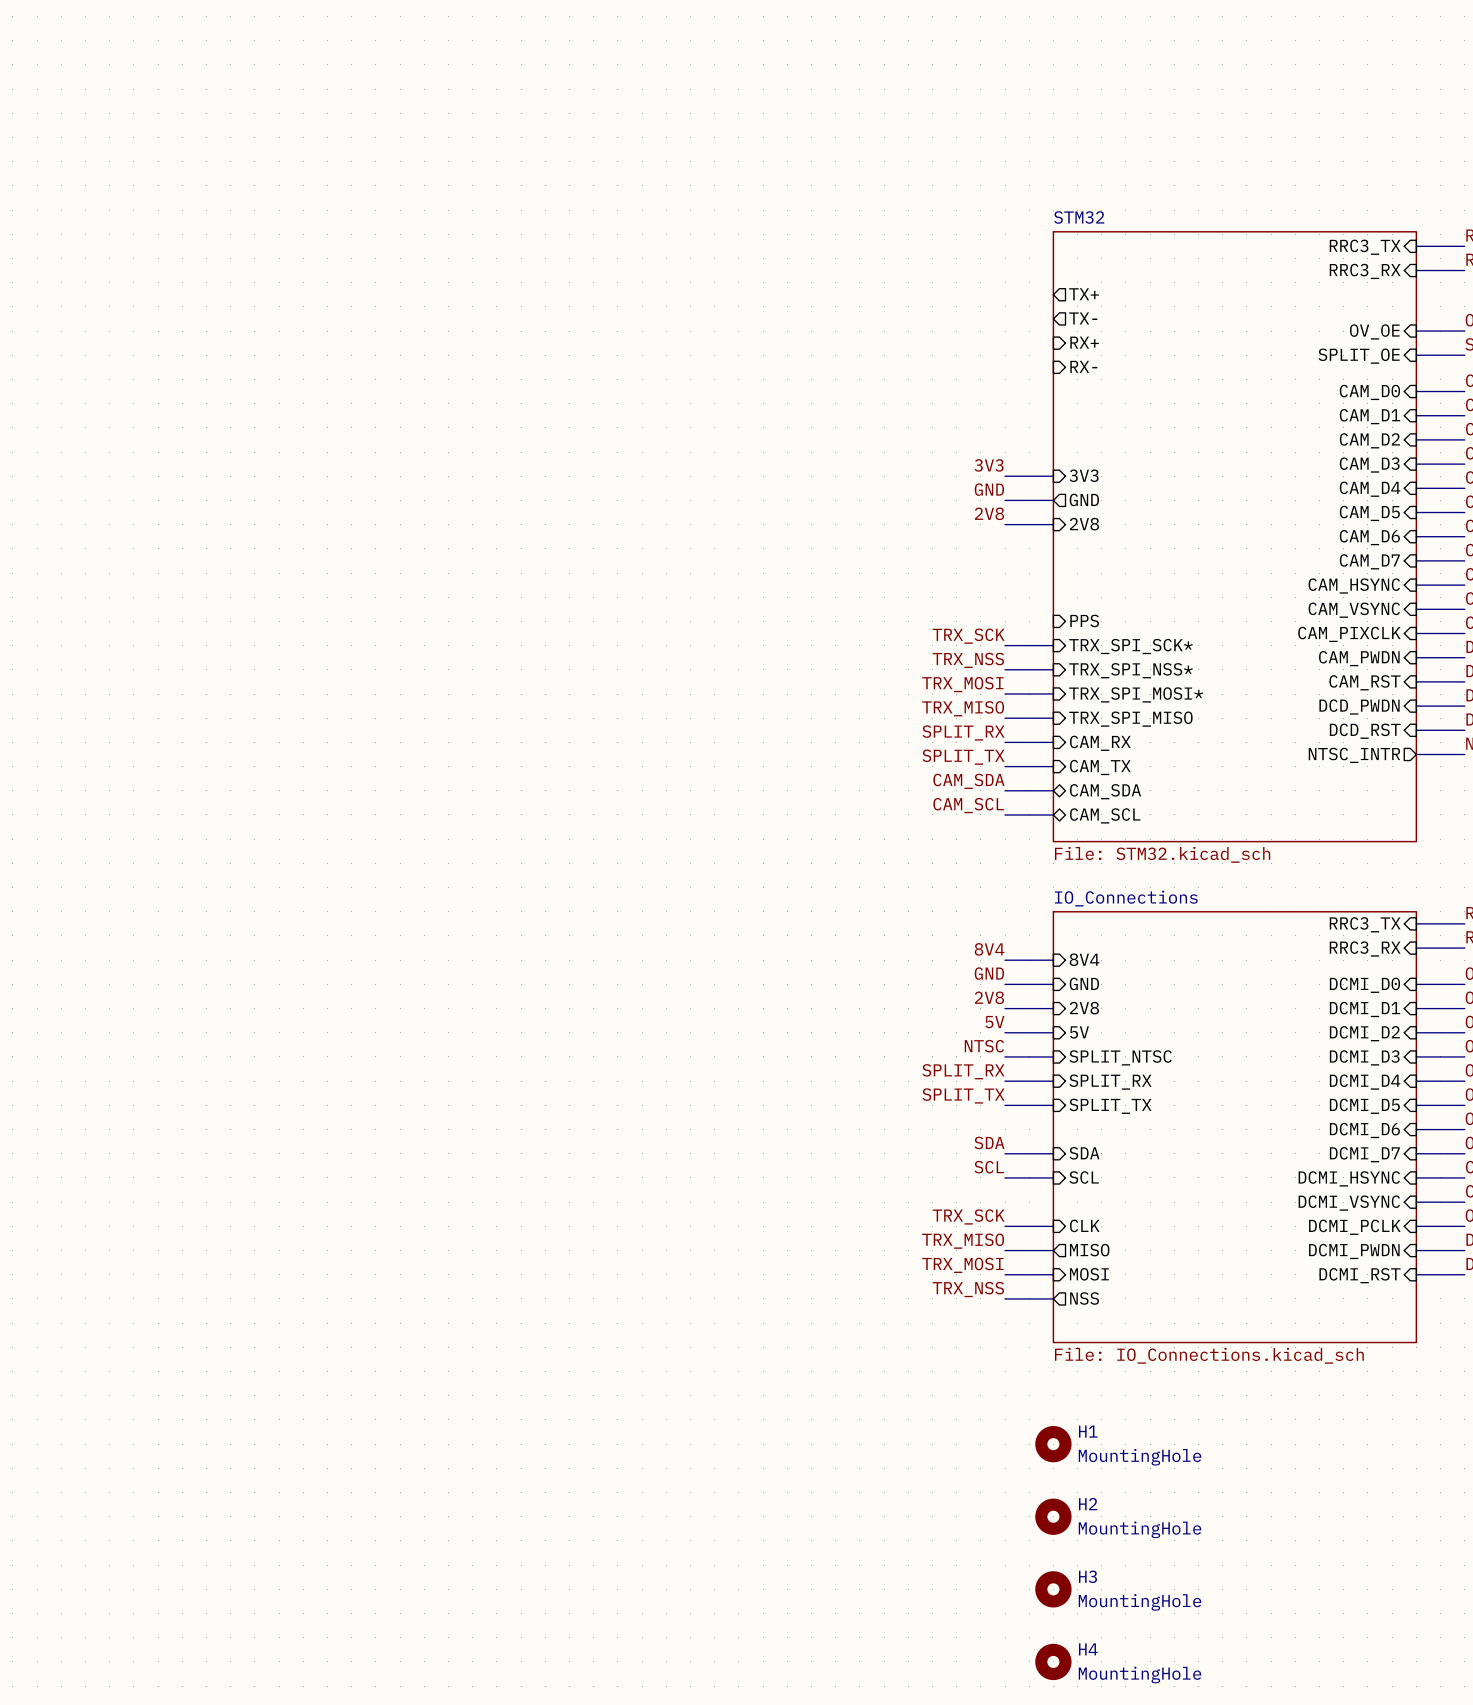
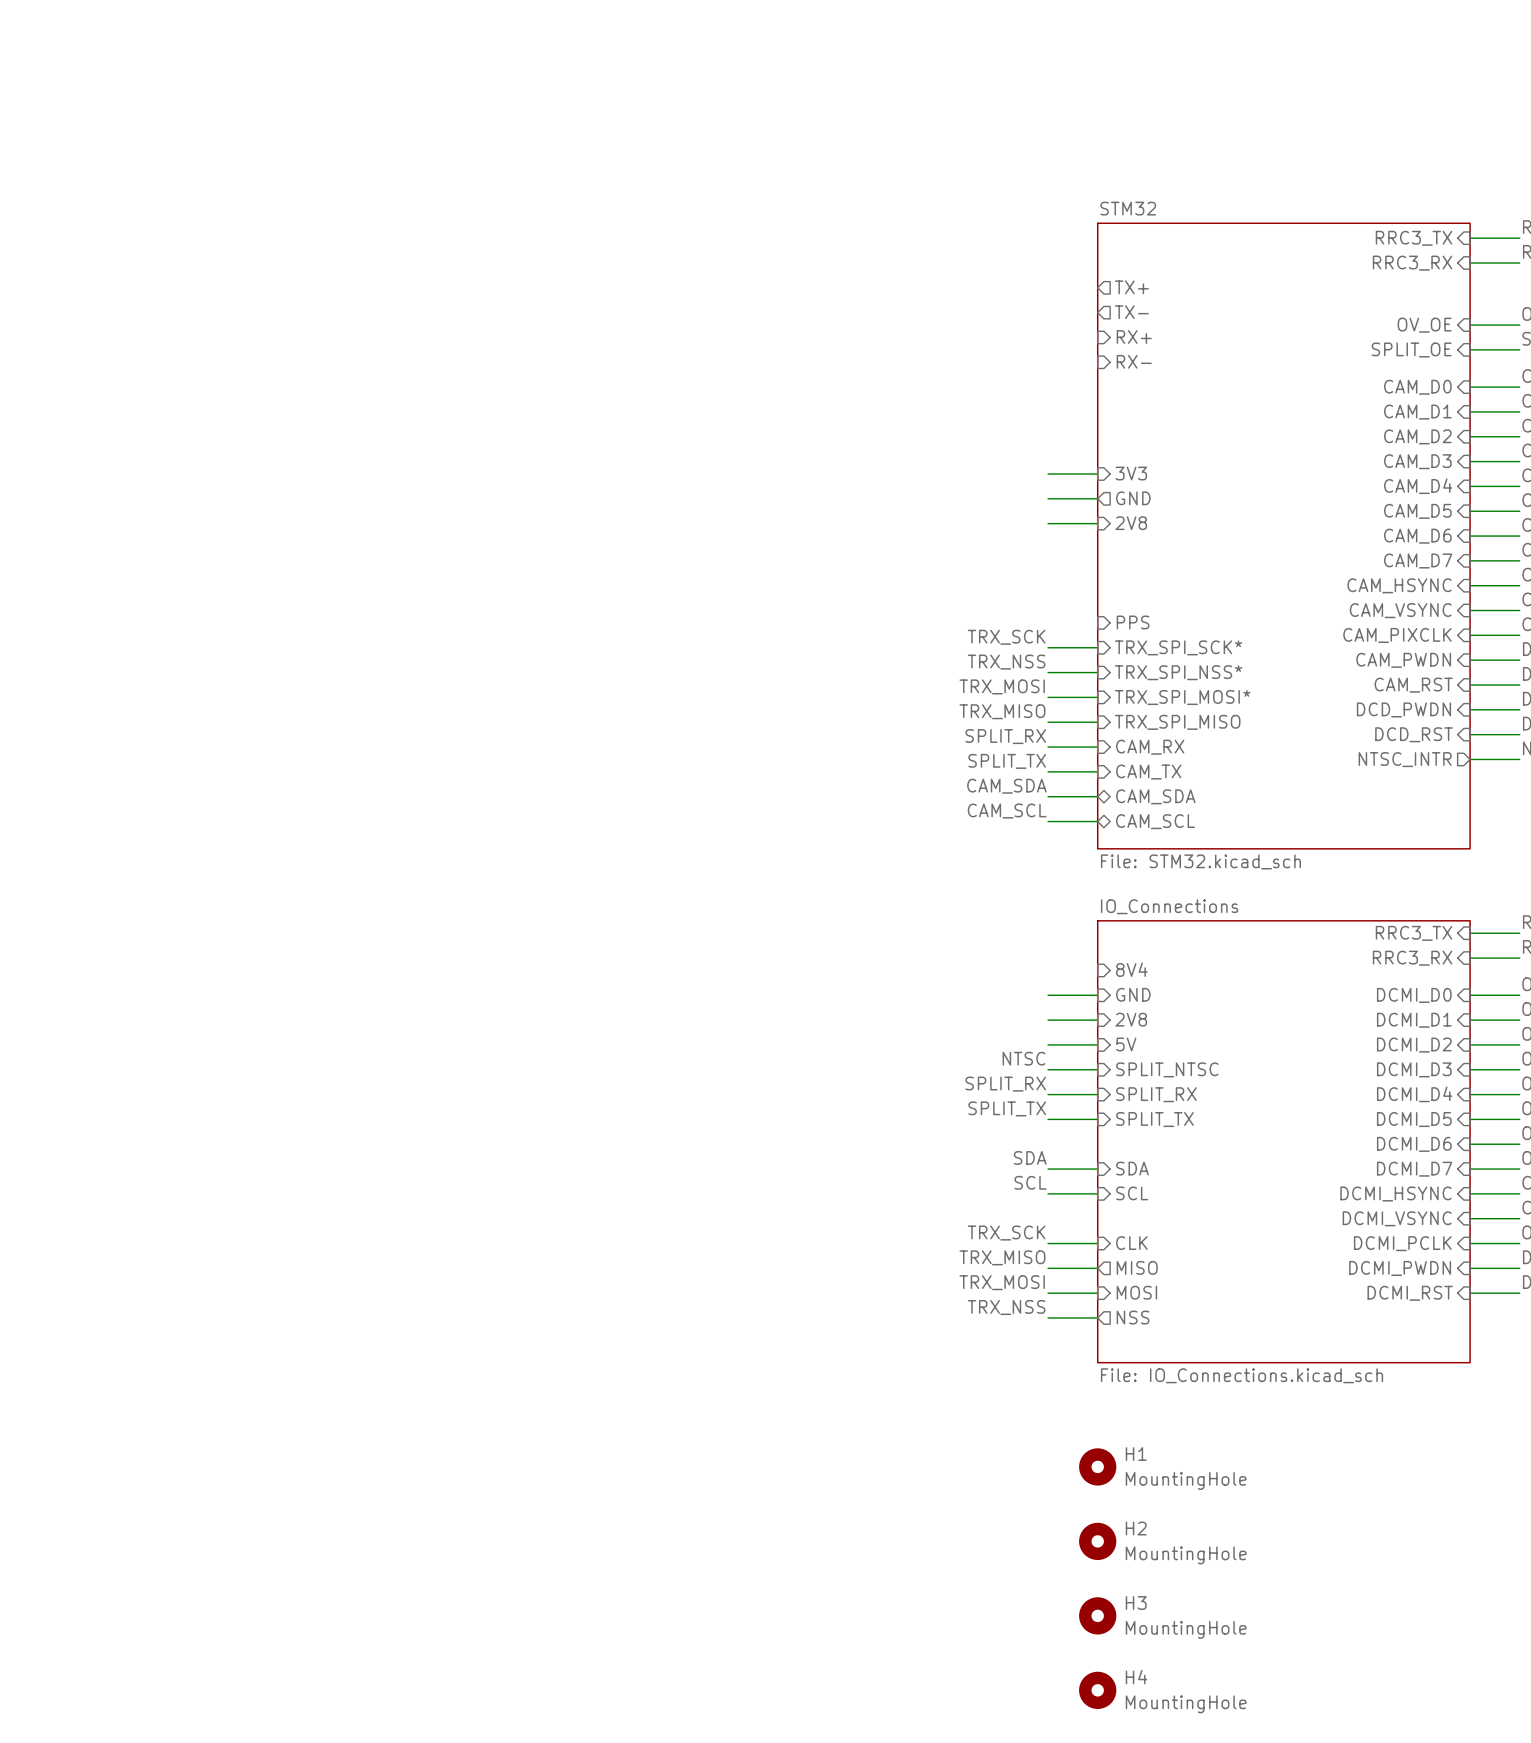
label: 3V3 (989, 465) -> none
label: GND (989, 489) -> none
label: 2V8 (989, 513) -> none
label: 8V4 (989, 949) -> none
wire: (1005, 960) (1053, 960) -> none
label: GND (989, 973) -> none
label: 2V8 (989, 997) -> none
label: 5V (994, 1022) -> none

